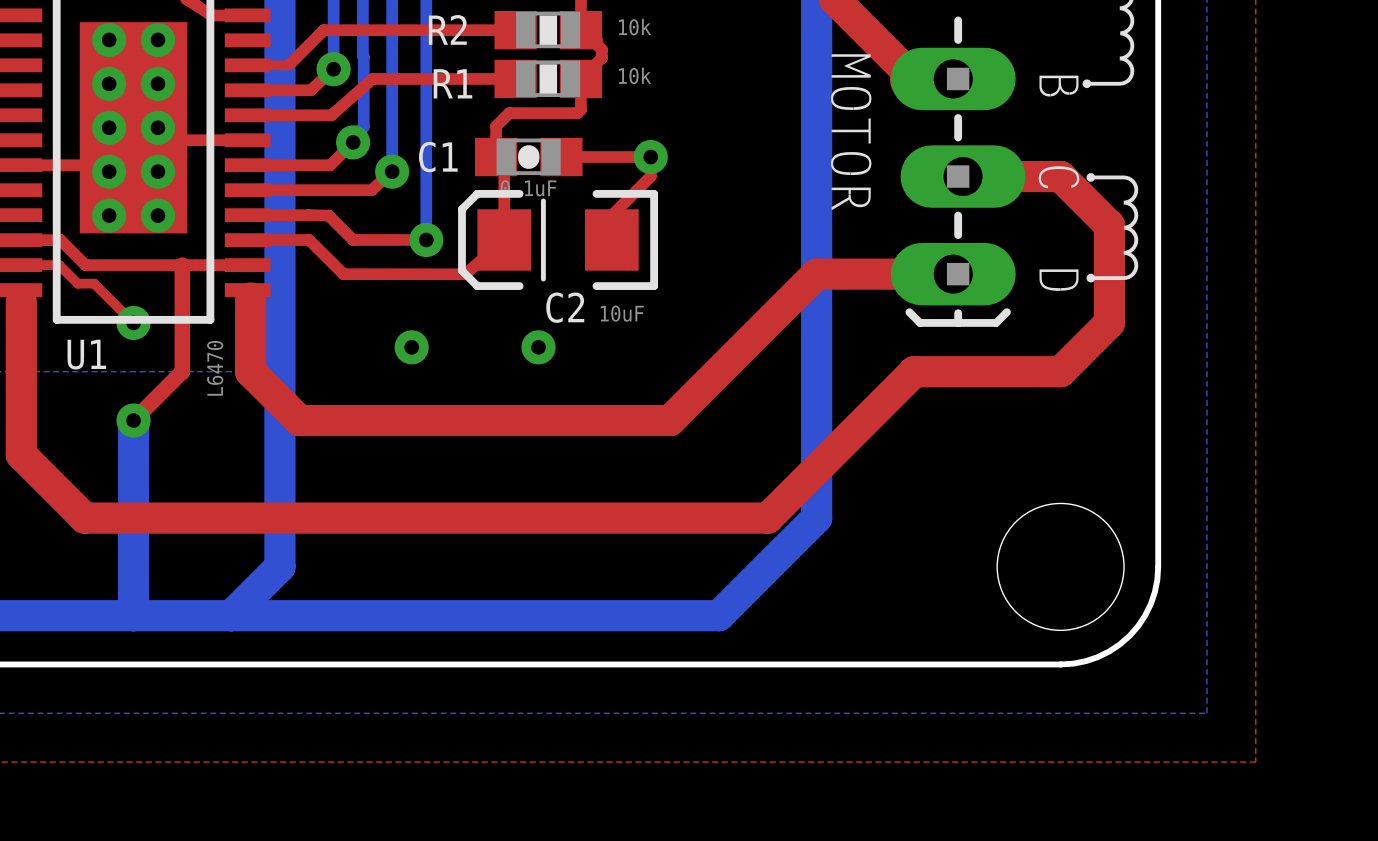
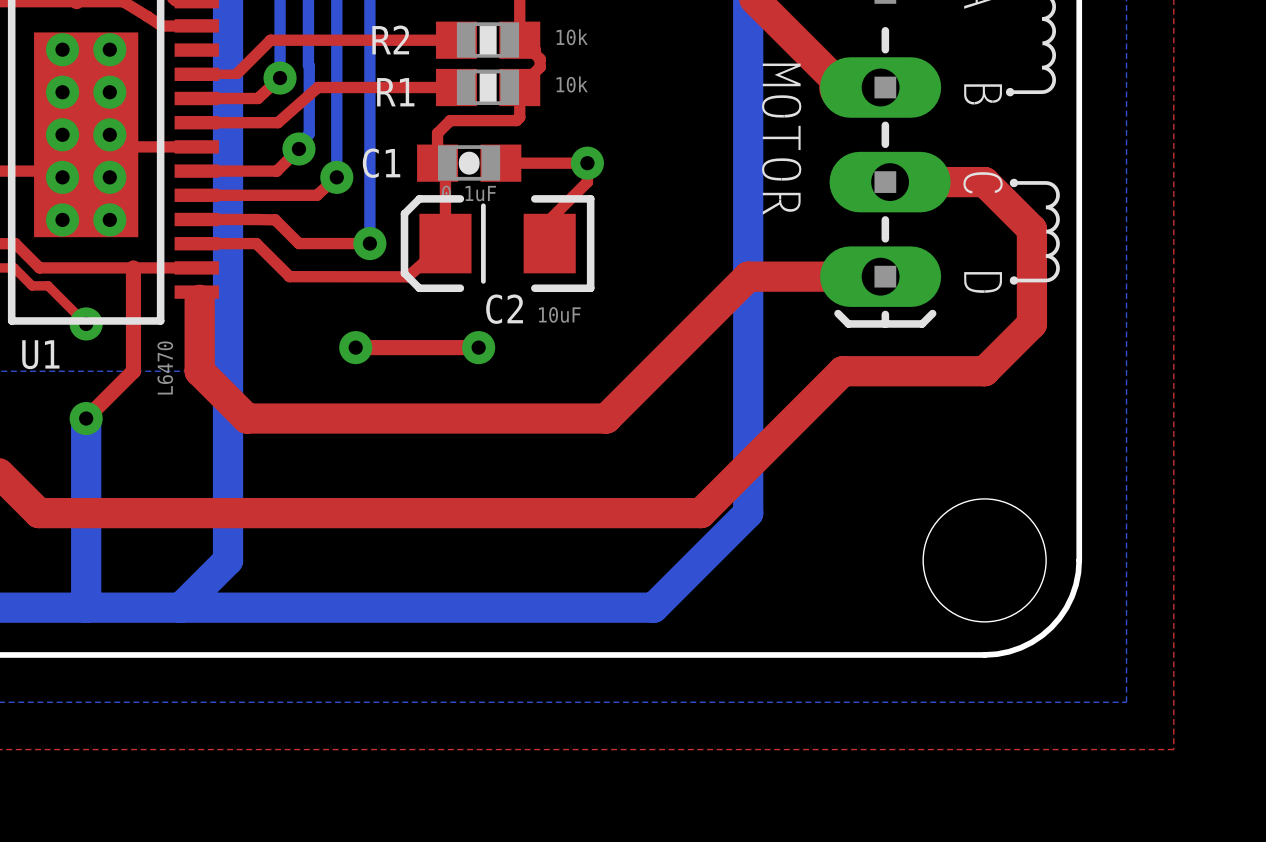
top track: none -> (355, 347) (478, 347)

